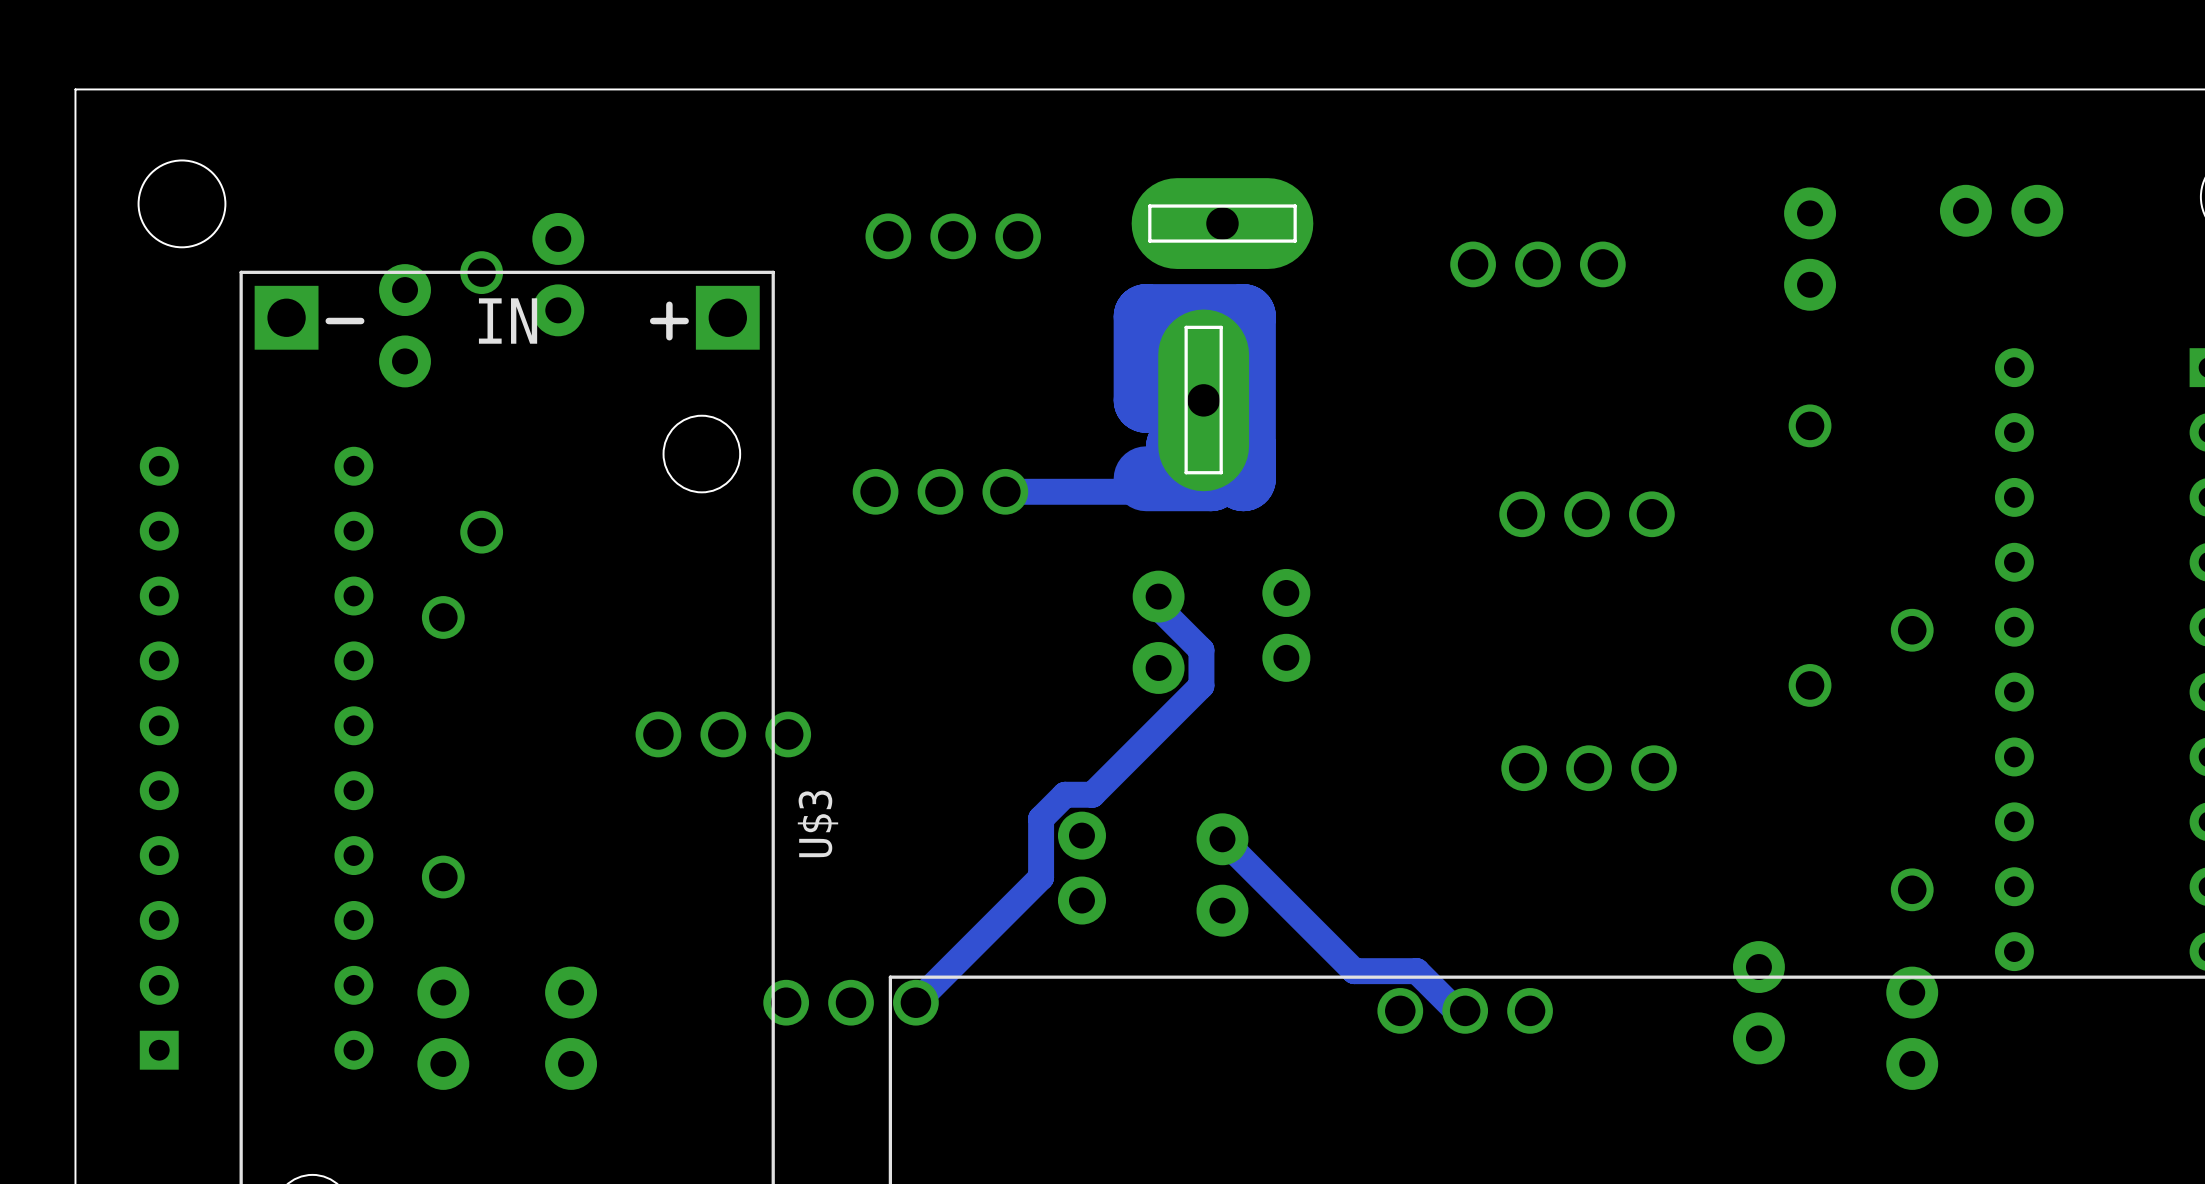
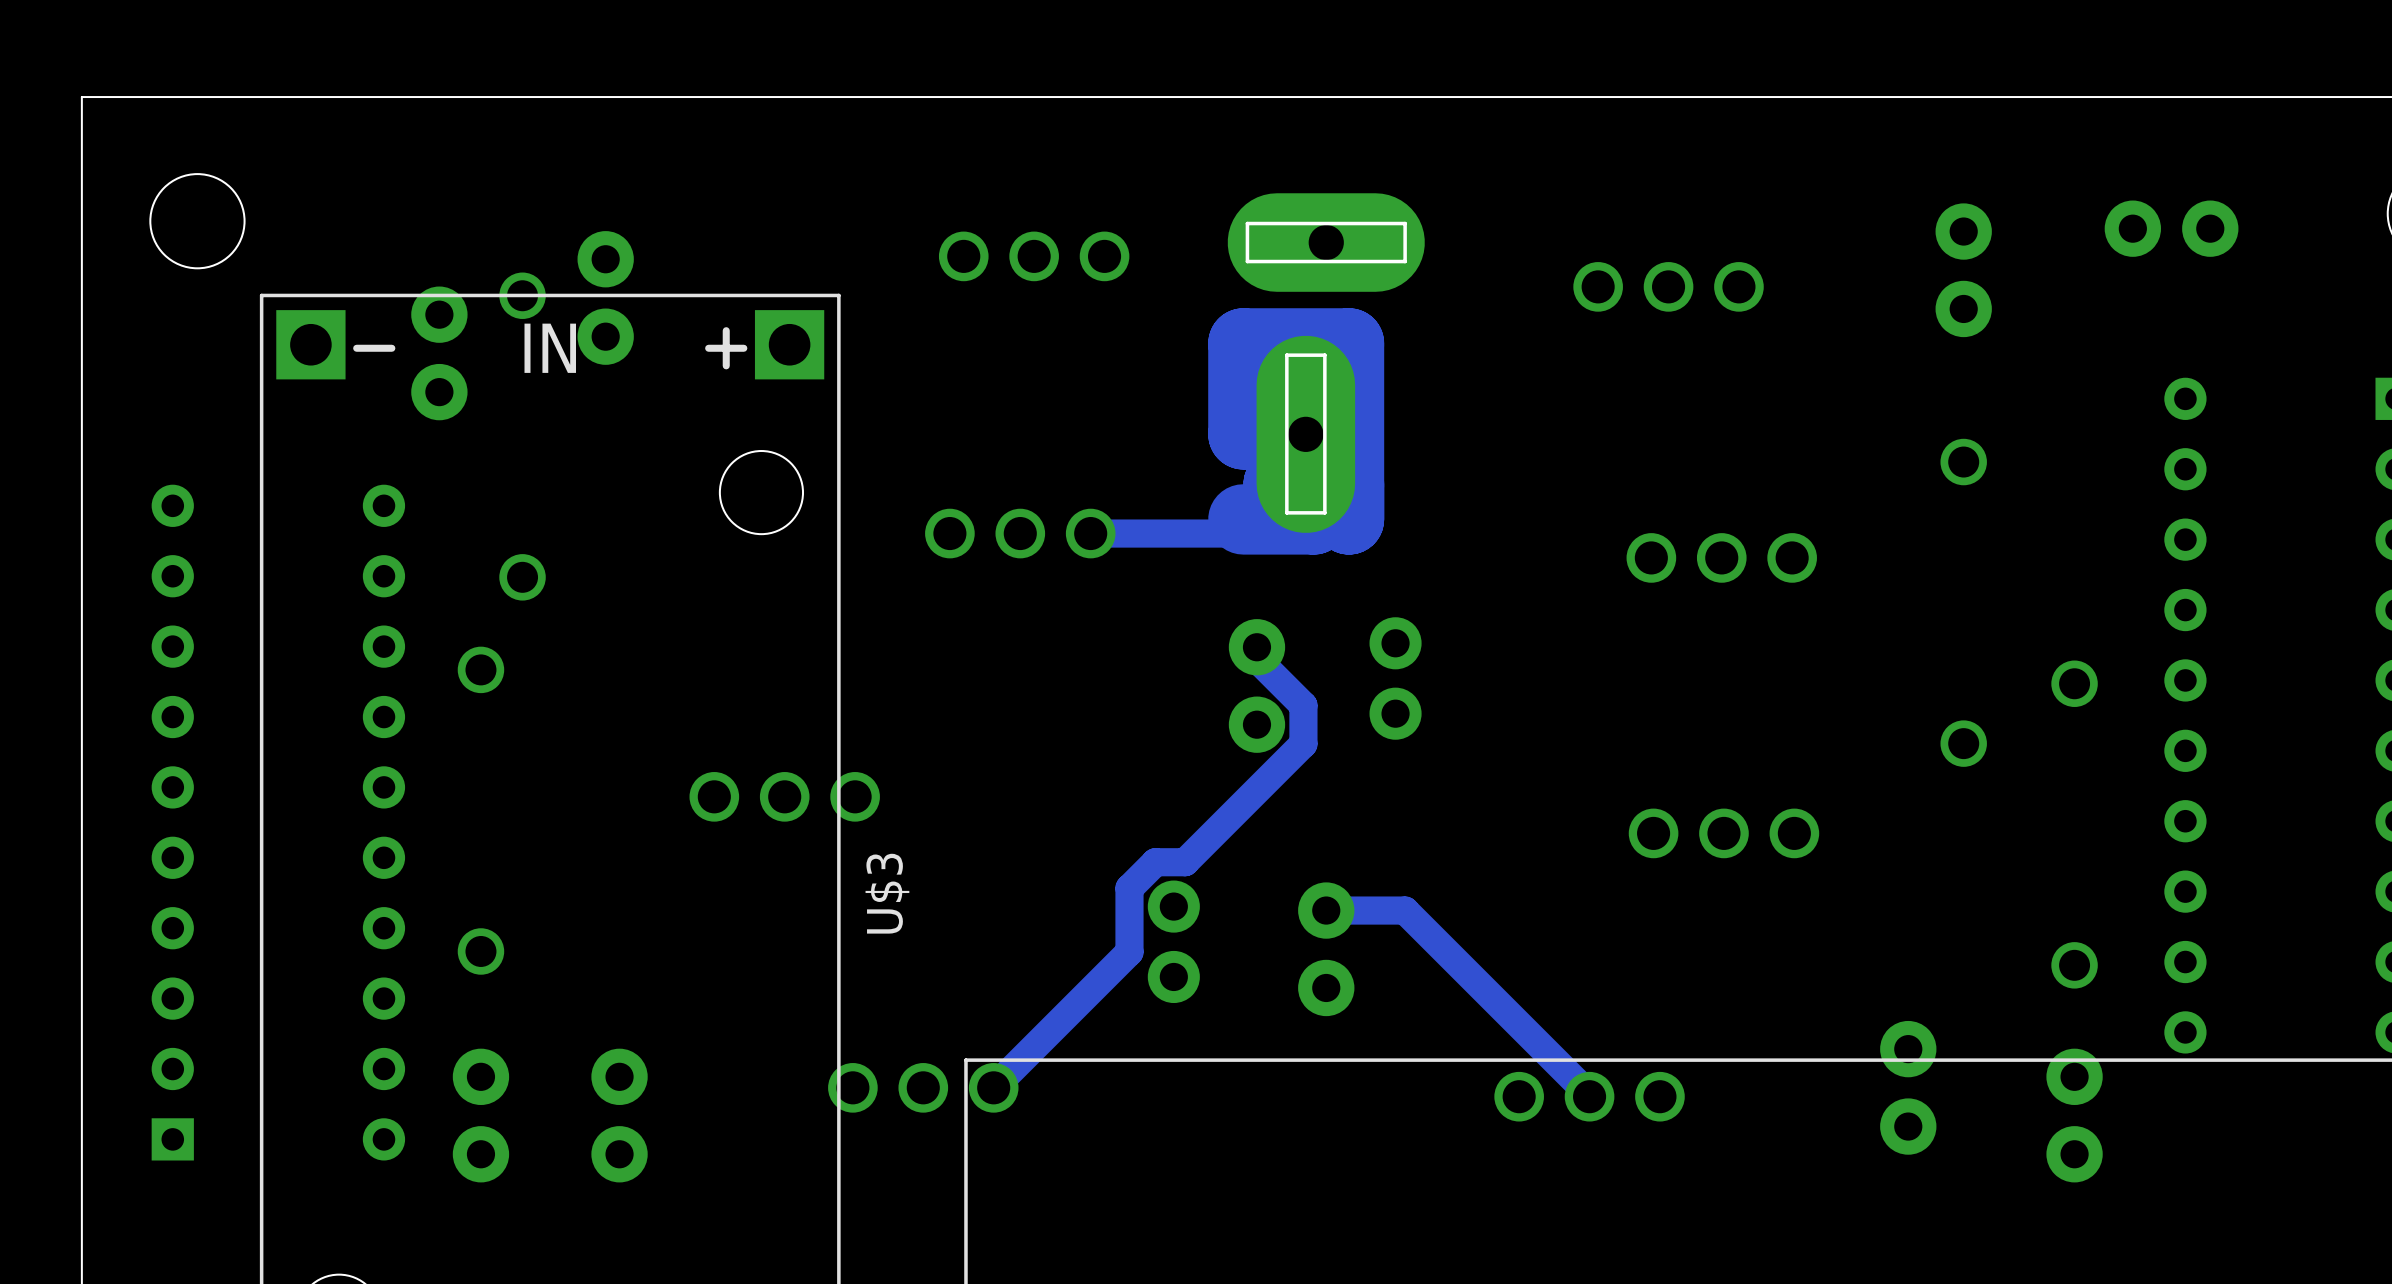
track: (1222, 839) (1354, 971) (1416, 971) (1456, 1010) (1465, 1010) -> (1326, 910) (1405, 910) (1590, 1096)

